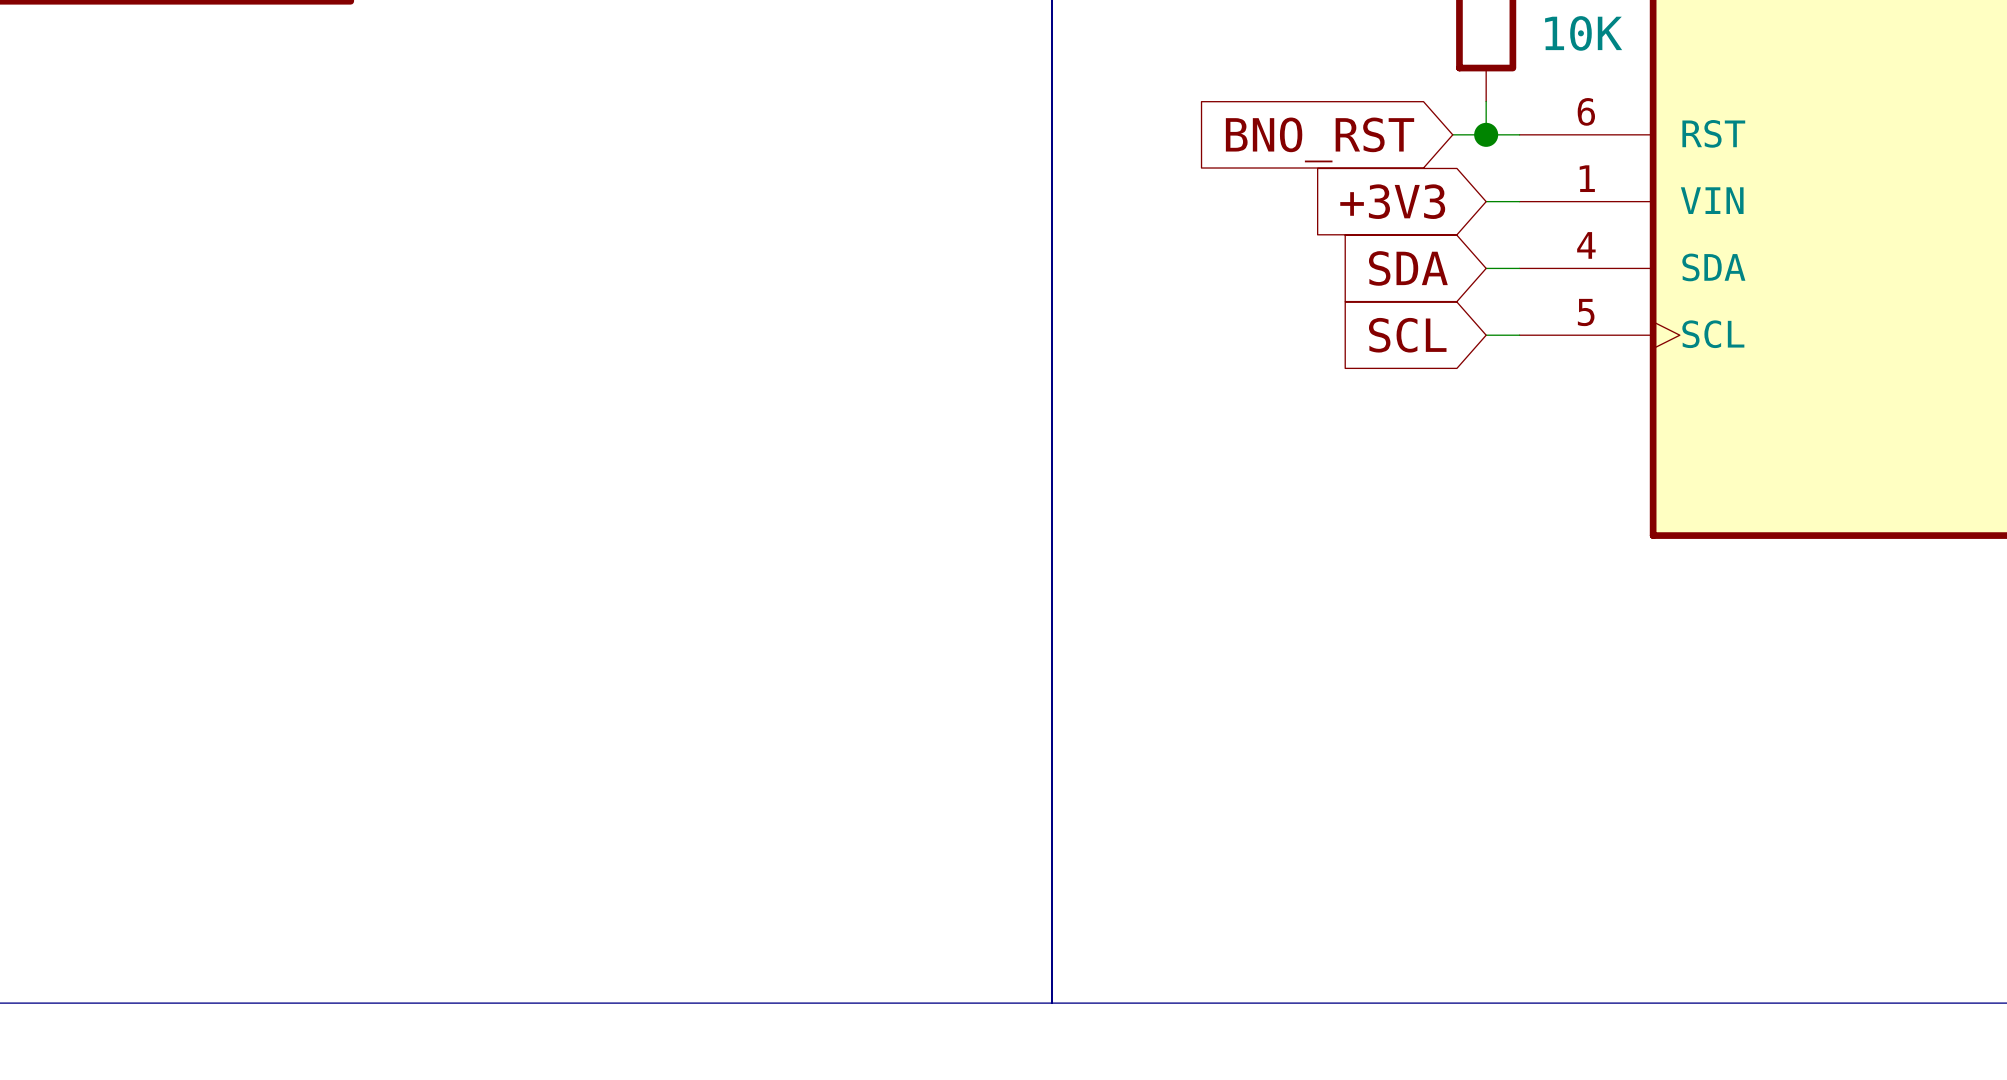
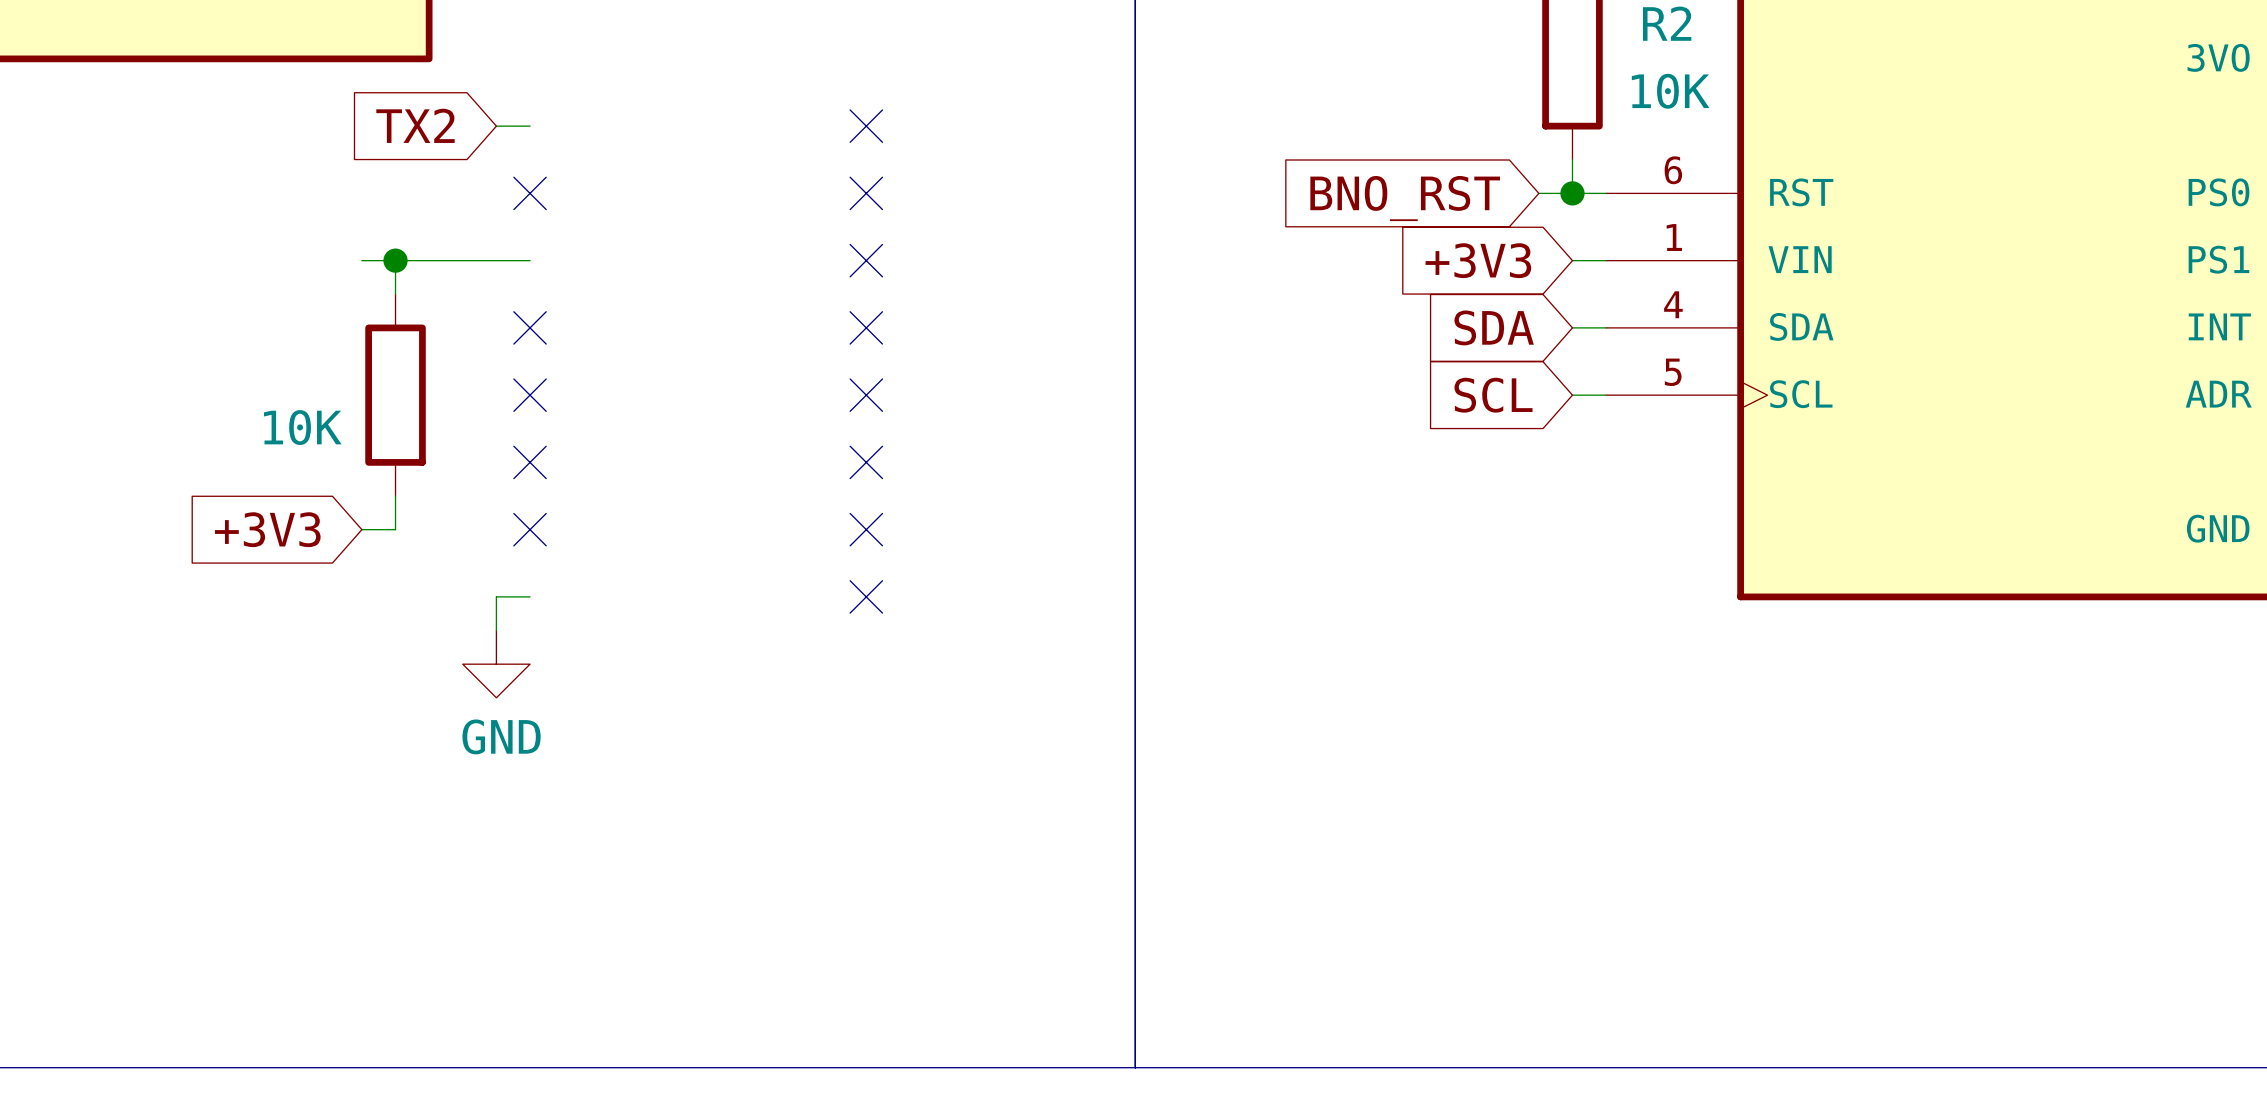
global label: none -> TX2 (415, 125)
wire: none -> (496, 126) (530, 126)
no-connect mark: none -> (866, 126)
no-connect mark: none -> (530, 193)
no-connect mark: none -> (866, 193)
wire: none -> (361, 260) (530, 260)
wire: none -> (395, 260) (395, 294)
junction: none -> (395, 260)
no-connect mark: none -> (866, 260)
no-connect mark: none -> (530, 327)
no-connect mark: none -> (866, 327)
part: none -> 10K (395, 395)
no-connect mark: none -> (530, 395)
no-connect mark: none -> (866, 395)
no-connect mark: none -> (530, 462)
no-connect mark: none -> (866, 462)
wire: none -> (395, 496) (395, 529) (361, 529)
global label: none -> +3V3 (267, 529)
no-connect mark: none -> (530, 529)
no-connect mark: none -> (866, 529)
wire: none -> (530, 596) (496, 596) (496, 630)
no-connect mark: none -> (866, 596)
power symbol: none -> GND (496, 664)

